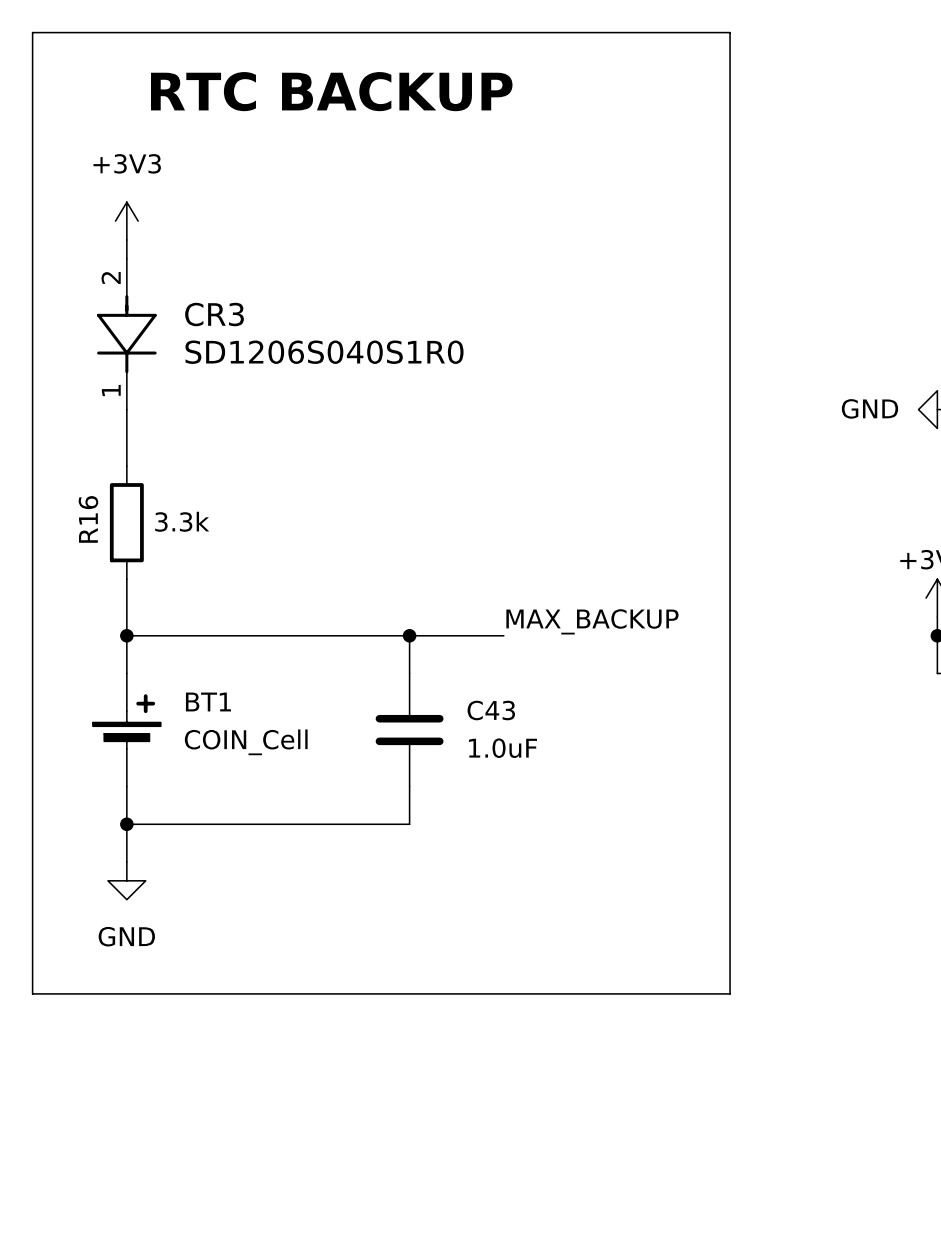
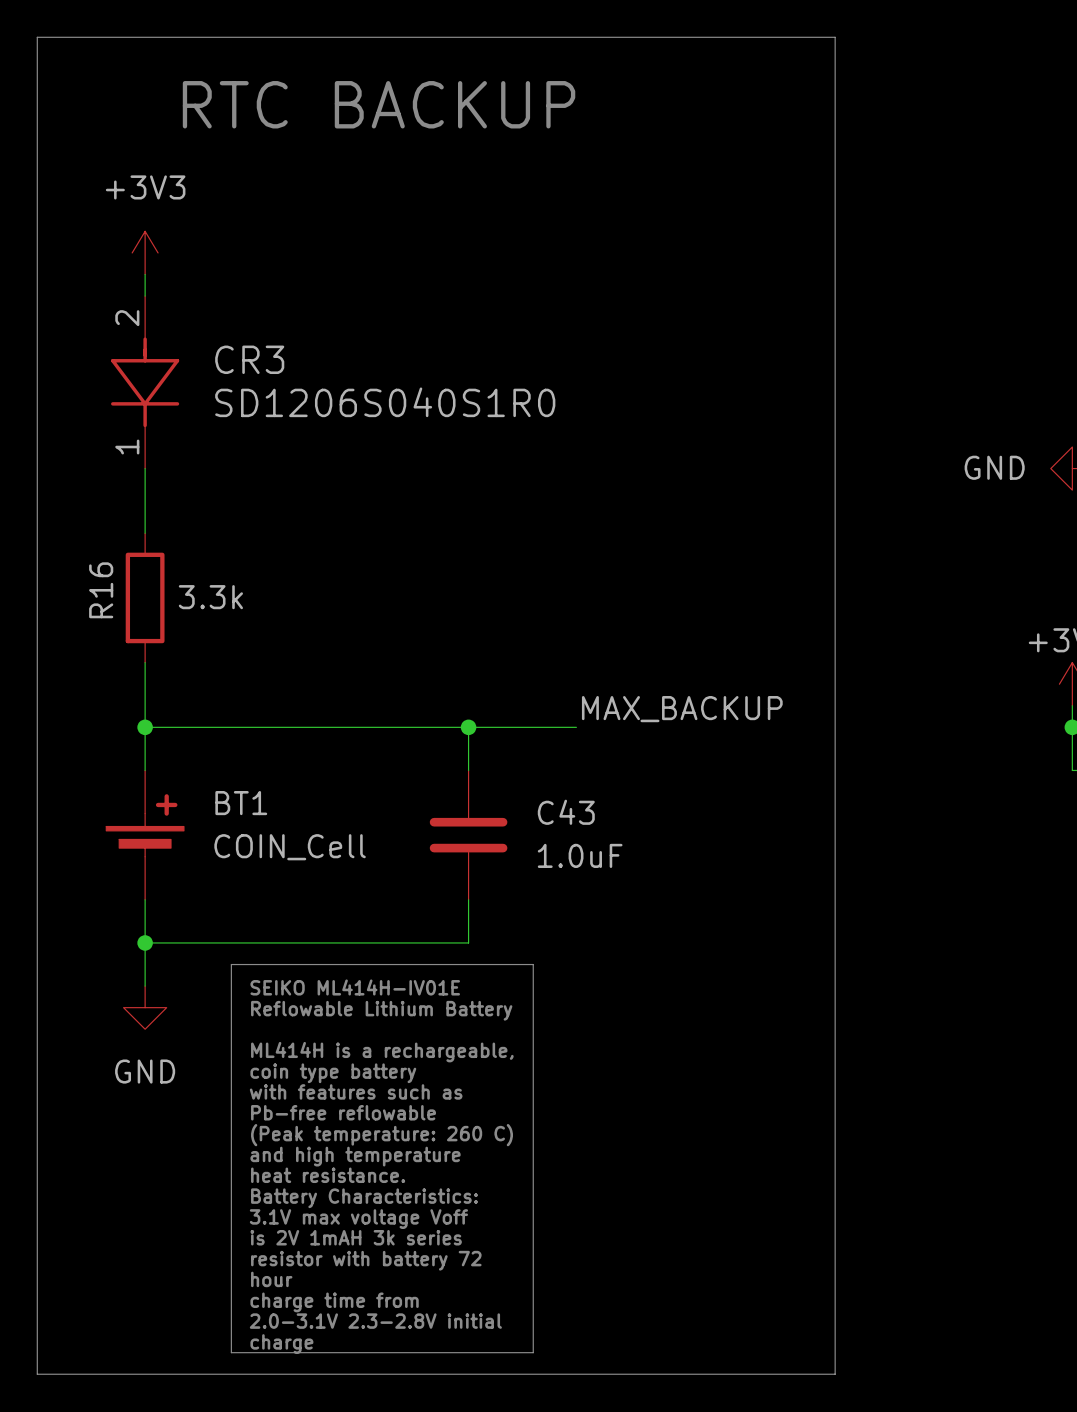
line: none -> (231, 964) (533, 964) (533, 1352) (231, 1352) (231, 964)
text: none -> SEIKO ML414H-IV01E (355, 987)
text: none -> Reflowable Lithium Battery (381, 1010)
text: none -> ML414H is a rechargeable, (382, 1052)
text: none -> coin type battery (333, 1073)
text: none -> with features such as (356, 1091)
text: none -> Pb-free reflowable (343, 1112)
text: none -> (Peak temperature: 260 C) (382, 1135)
line: (32, 993) (730, 993) -> (37, 1137) (37, 1374) (835, 1374) (835, 1137)
text: none -> and high temperature (355, 1156)
text: none -> heat resistance. (328, 1175)
text: none -> Battery Characteristics: (364, 1198)
text: none -> 3.1V max voltage Voff (358, 1219)
text: none -> is 2V 1mAH 3k series (356, 1237)
text: none -> resistor with battery 72 (366, 1260)
text: none -> hour (271, 1279)
text: none -> charge time from (334, 1302)
text: none -> 2.0-3.1V 2.3-2.8V initial (375, 1321)
text: none -> charge (281, 1344)

